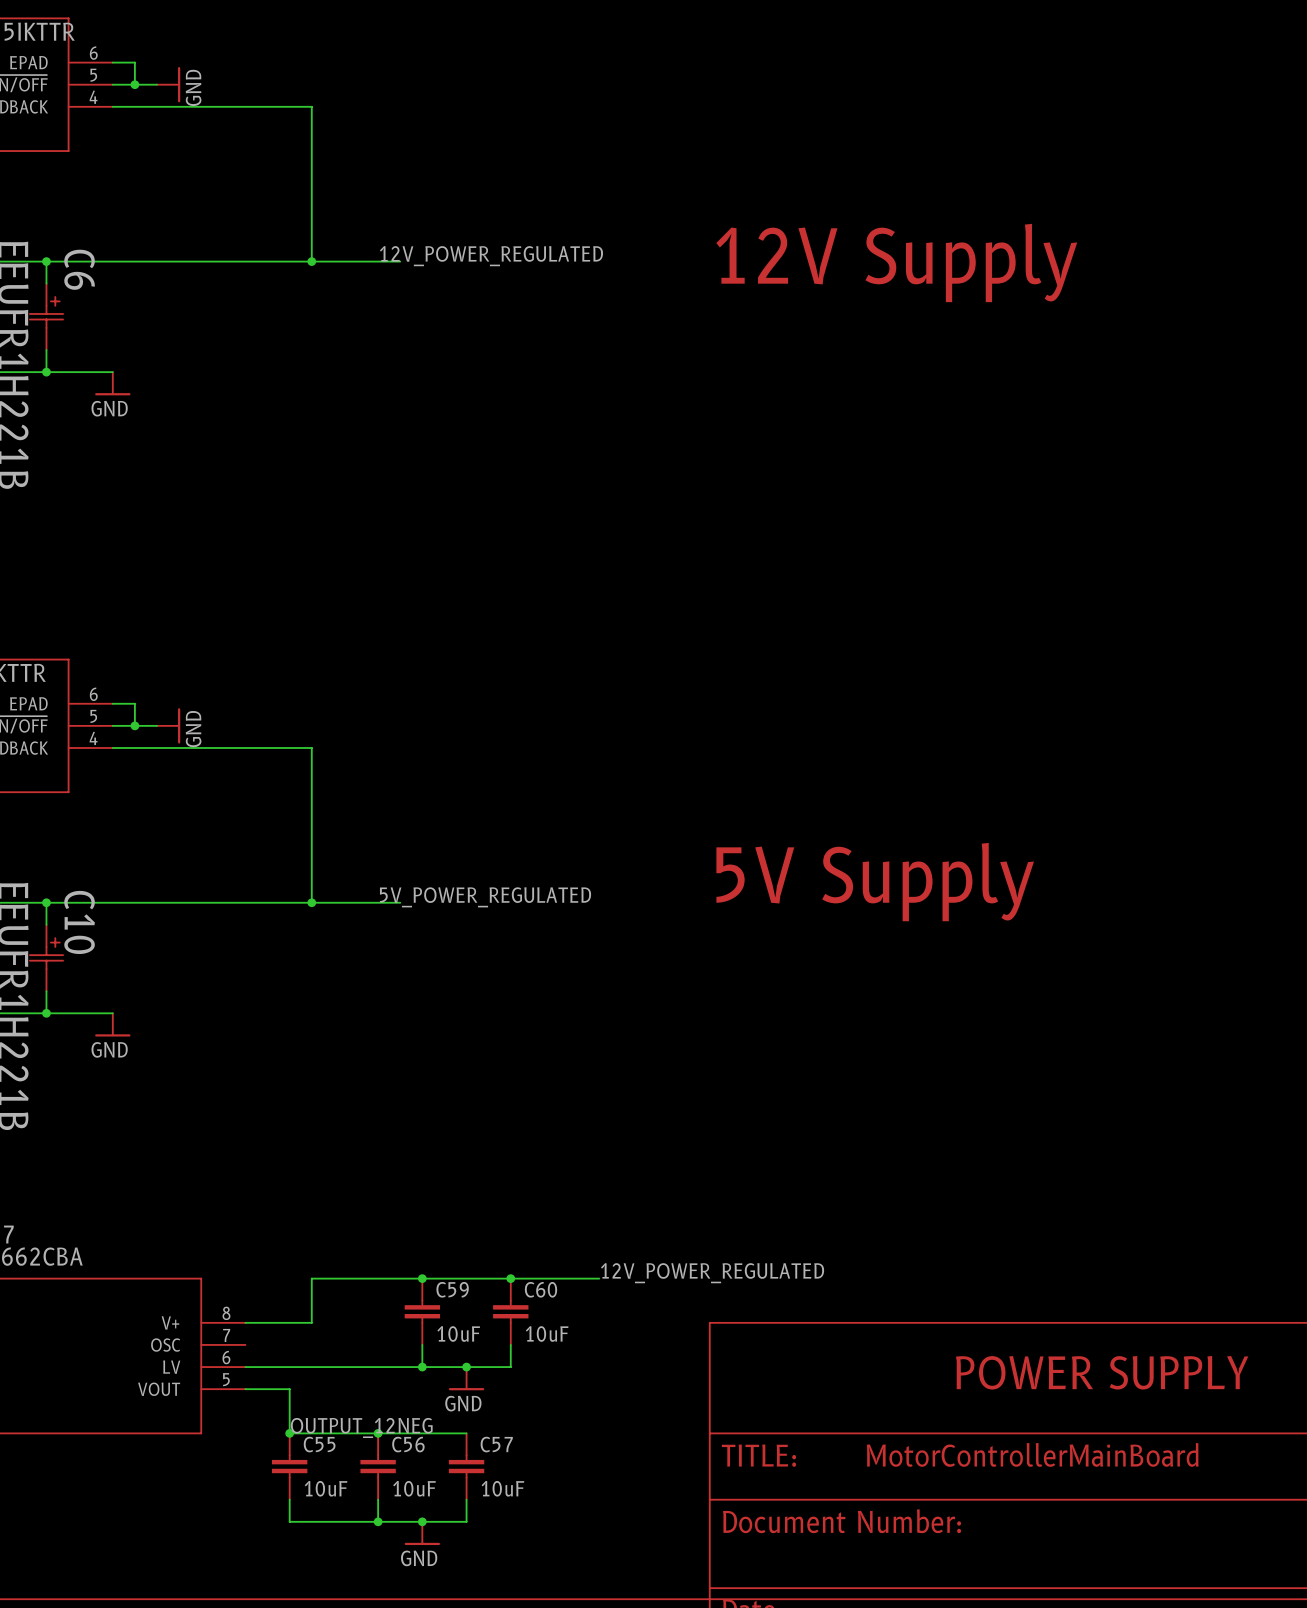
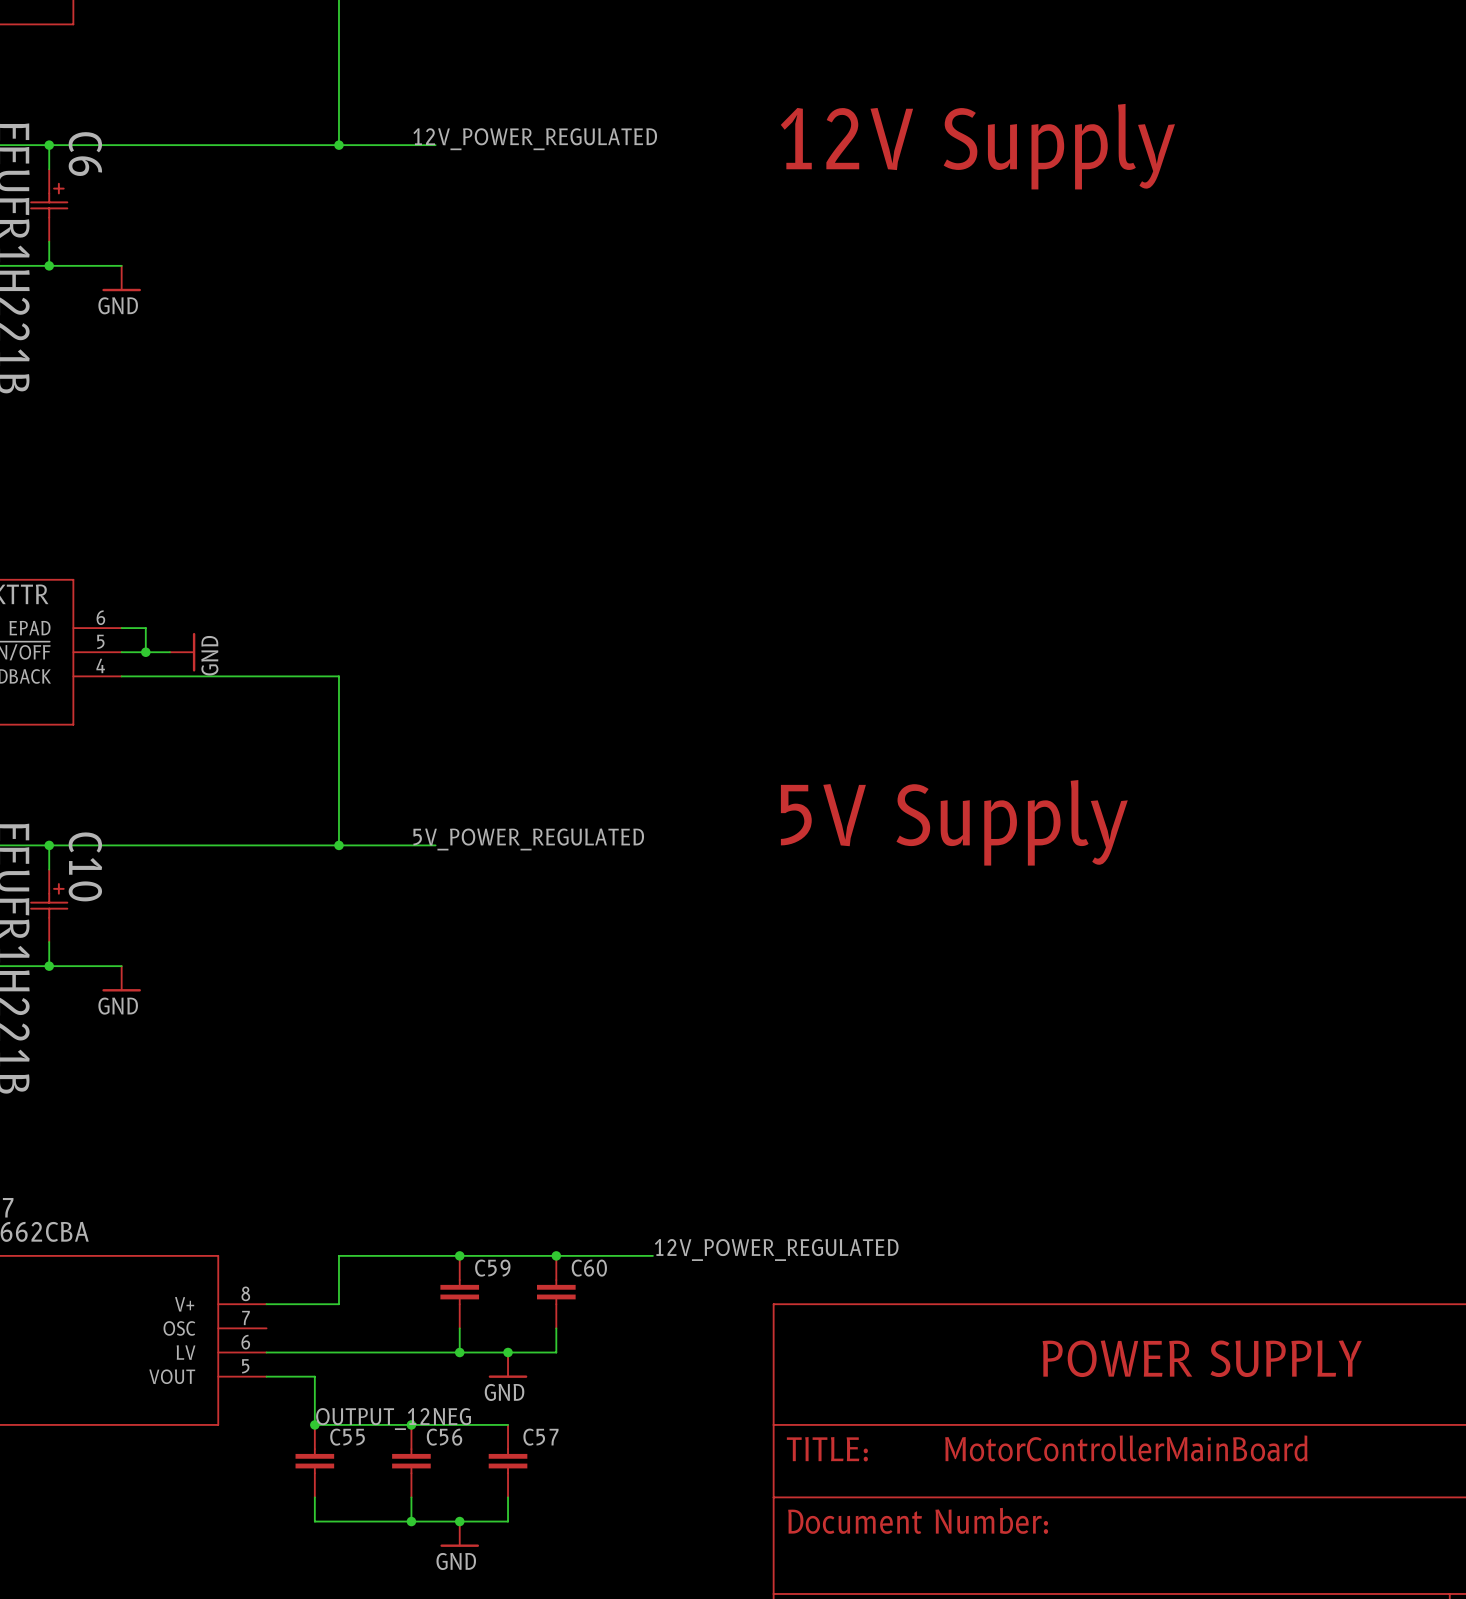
C59 value: 10uF (458, 1333) -> none
C60 value: 10uF (547, 1333) -> none
C55 value: 10uF (326, 1488) -> none
C56 value: 10uF (414, 1488) -> none
C57 value: 10uF (502, 1488) -> none

